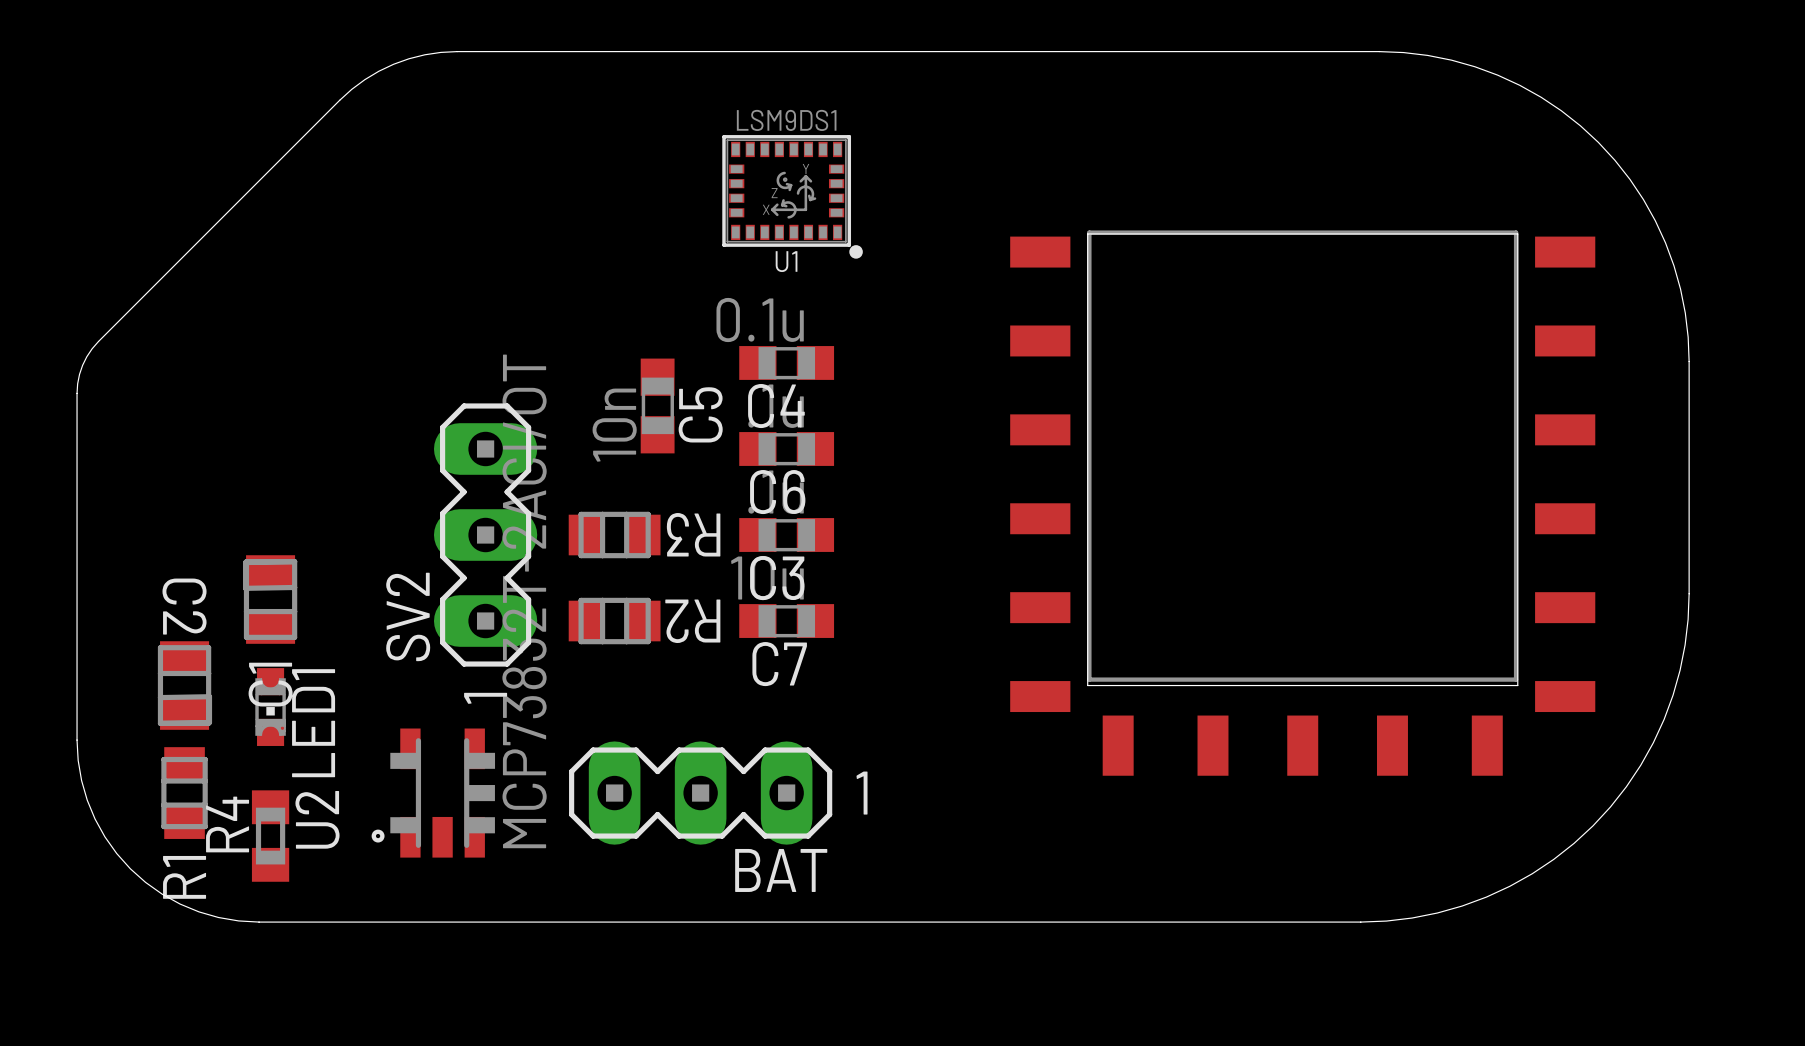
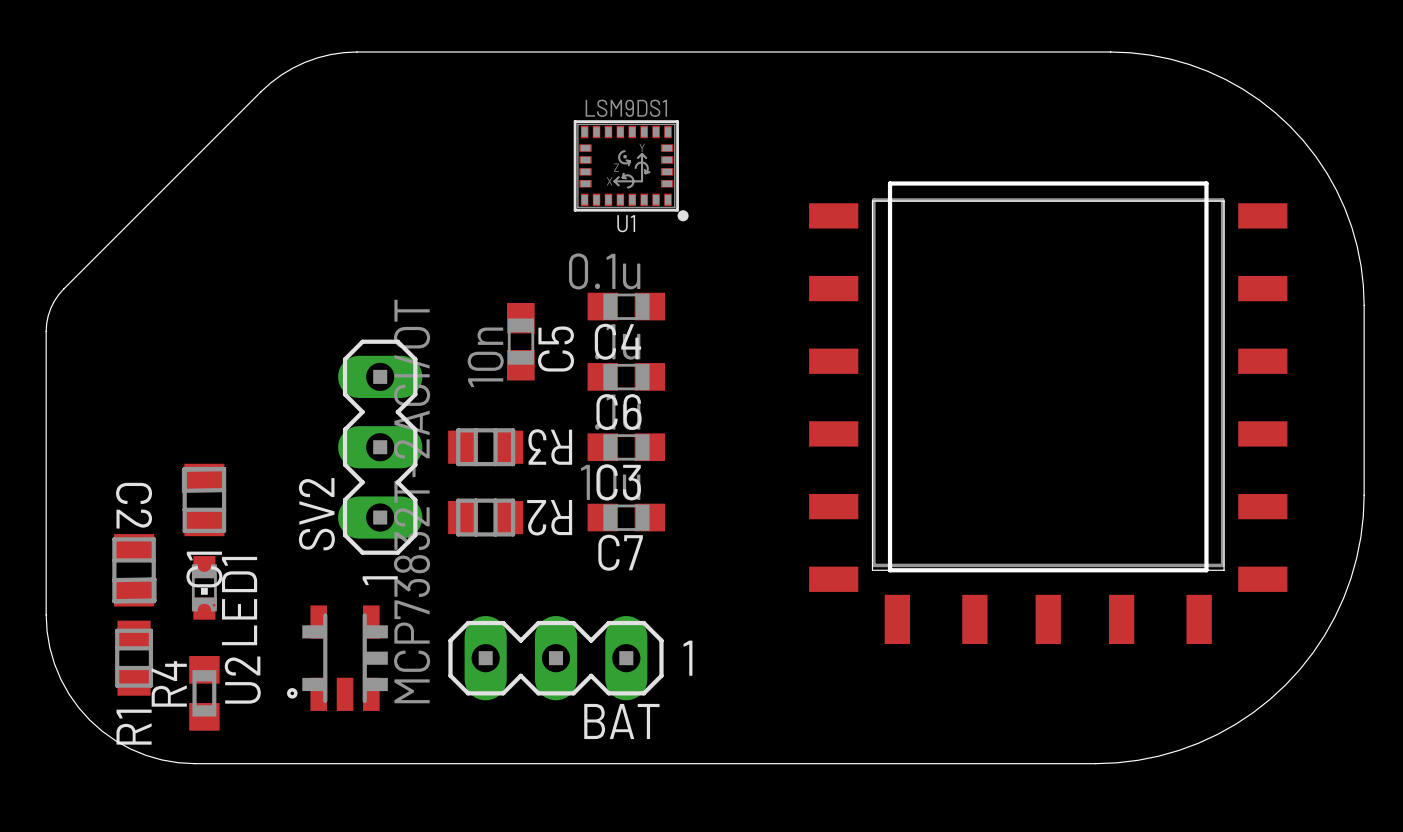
board edge: none -> (890, 183) (890, 570) (1206, 570) (1206, 183) (890, 183)

